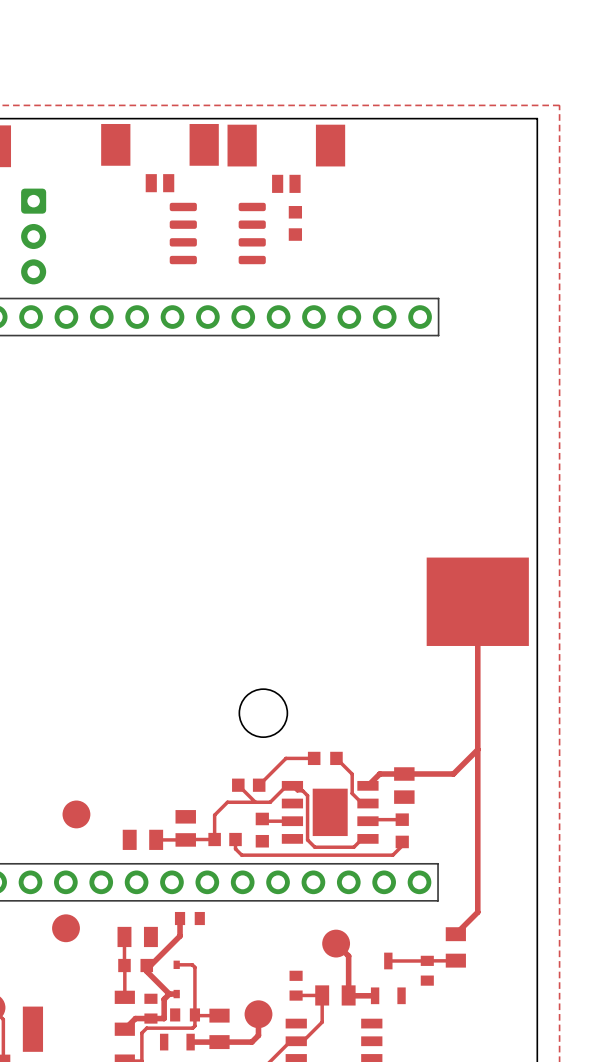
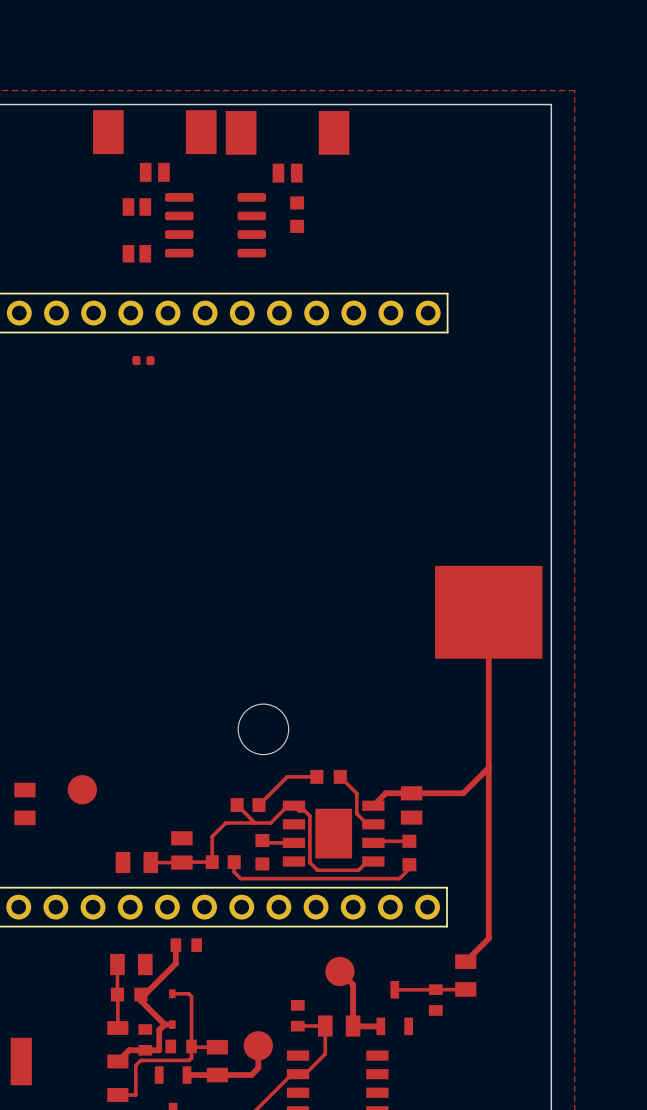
part: (33, 236) -> none
part: none -> (136, 230)
part: none -> (143, 360)
part: none -> (24, 803)
part position: (76, 814) -> (82, 789)
part: (66, 928) -> none

